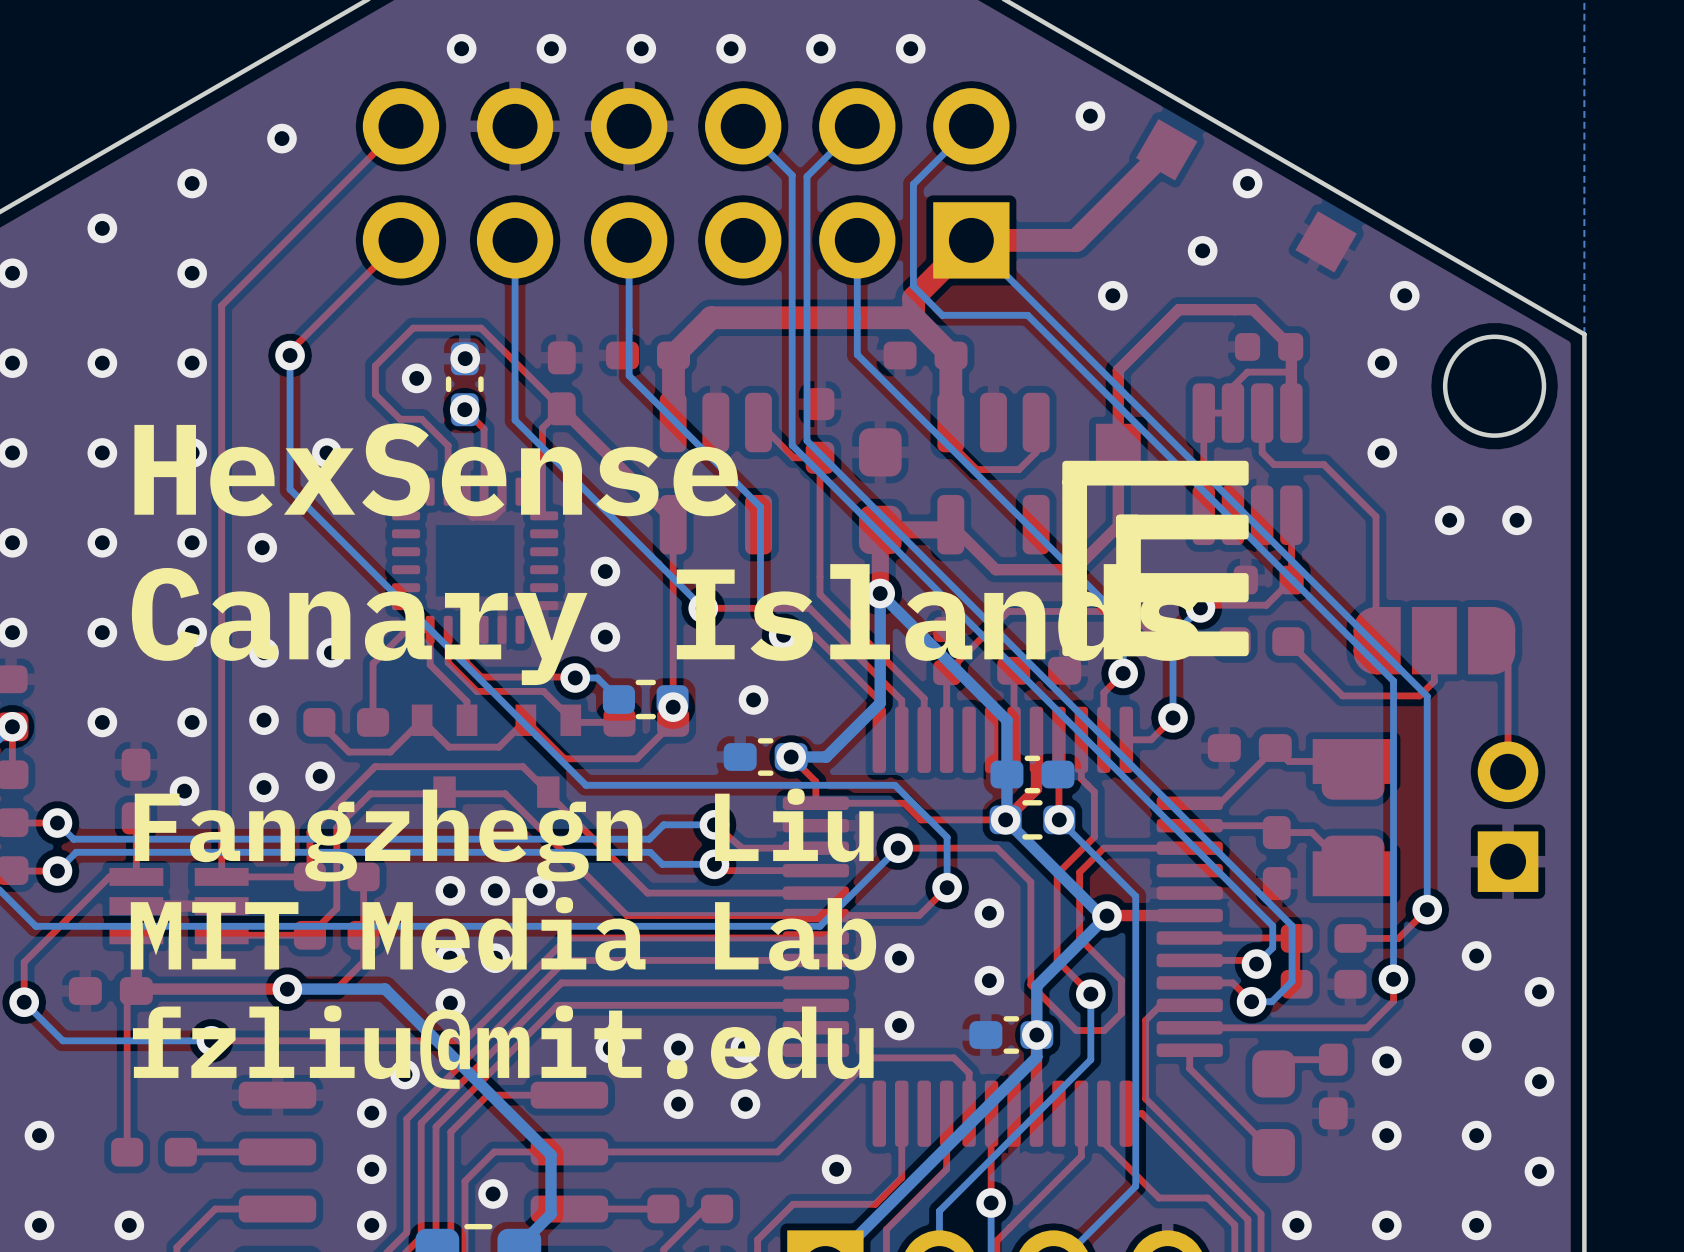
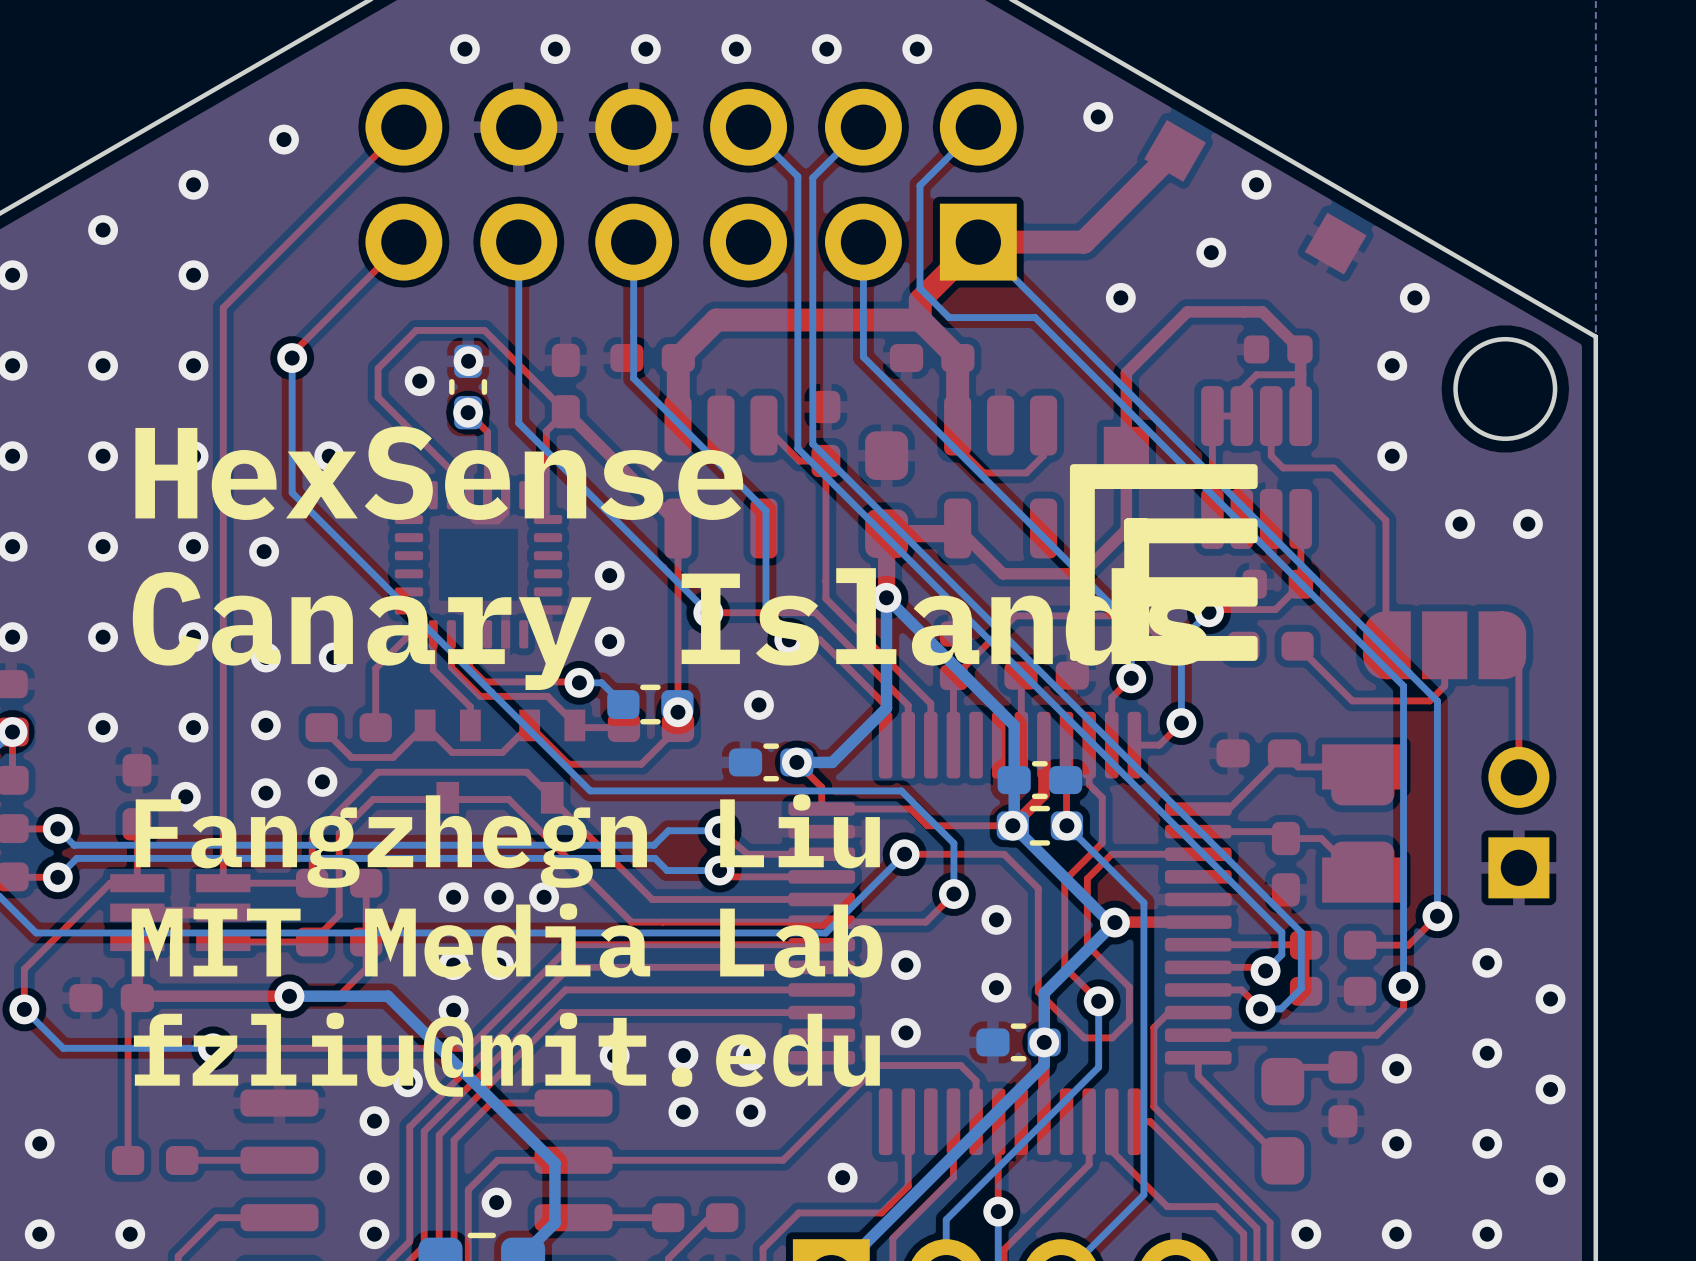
top track: (400, 419) (421, 419) (448, 445) (448, 467) -> (402, 422) (451, 470)

